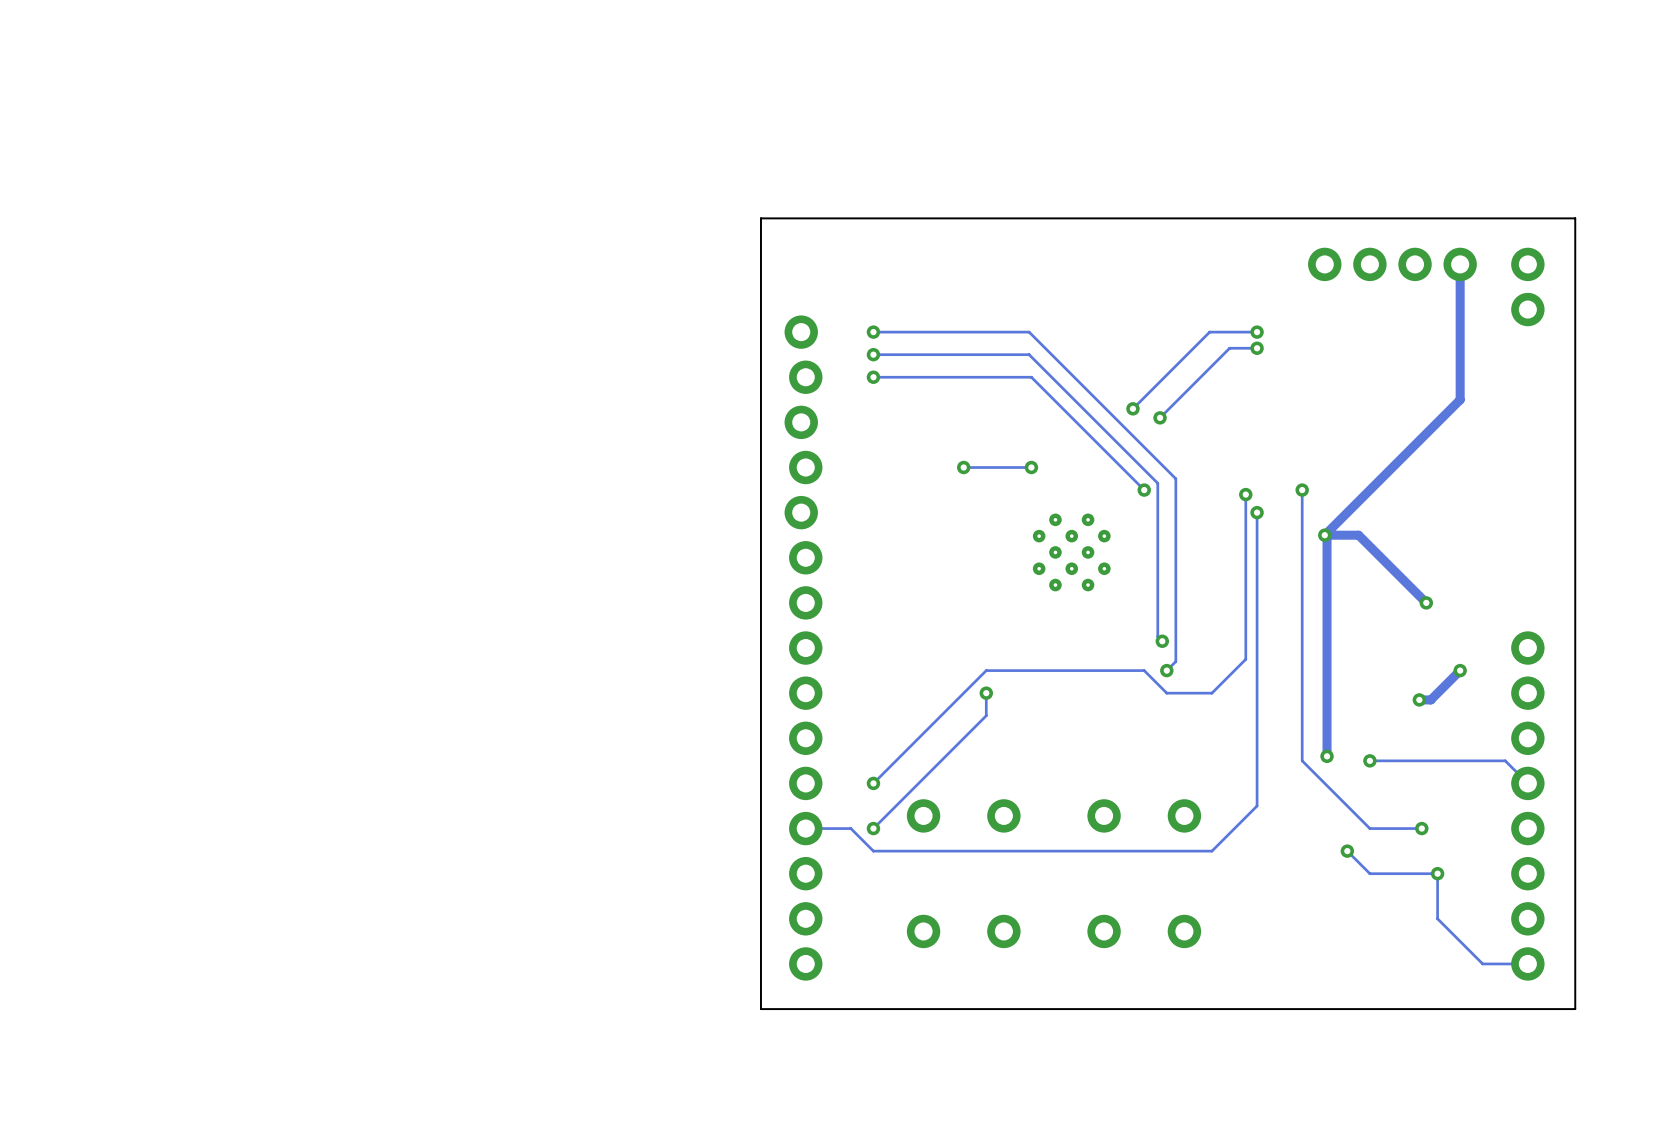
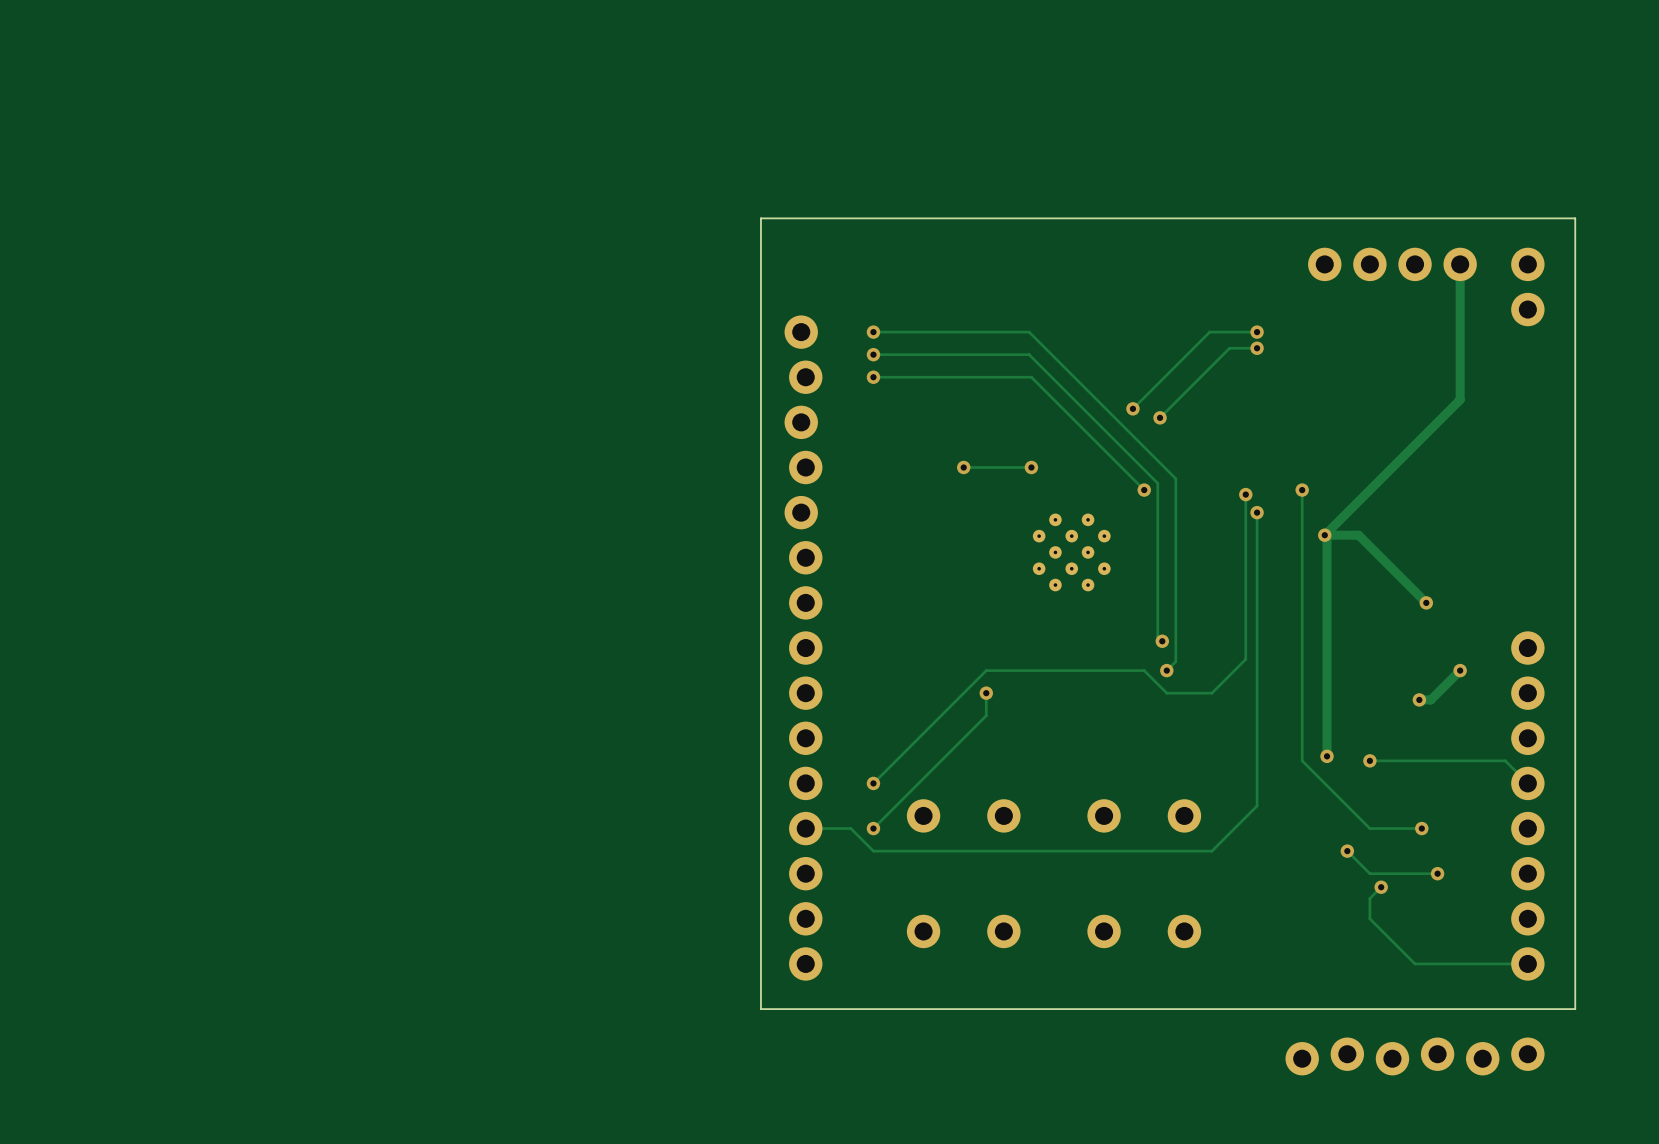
track: (1437, 873) (1437, 918) (1482, 963) -> (1381, 887) (1369, 898) (1369, 918) (1415, 963) (1482, 963)
via: none -> (1381, 887)
part: none -> (1415, 1056)

